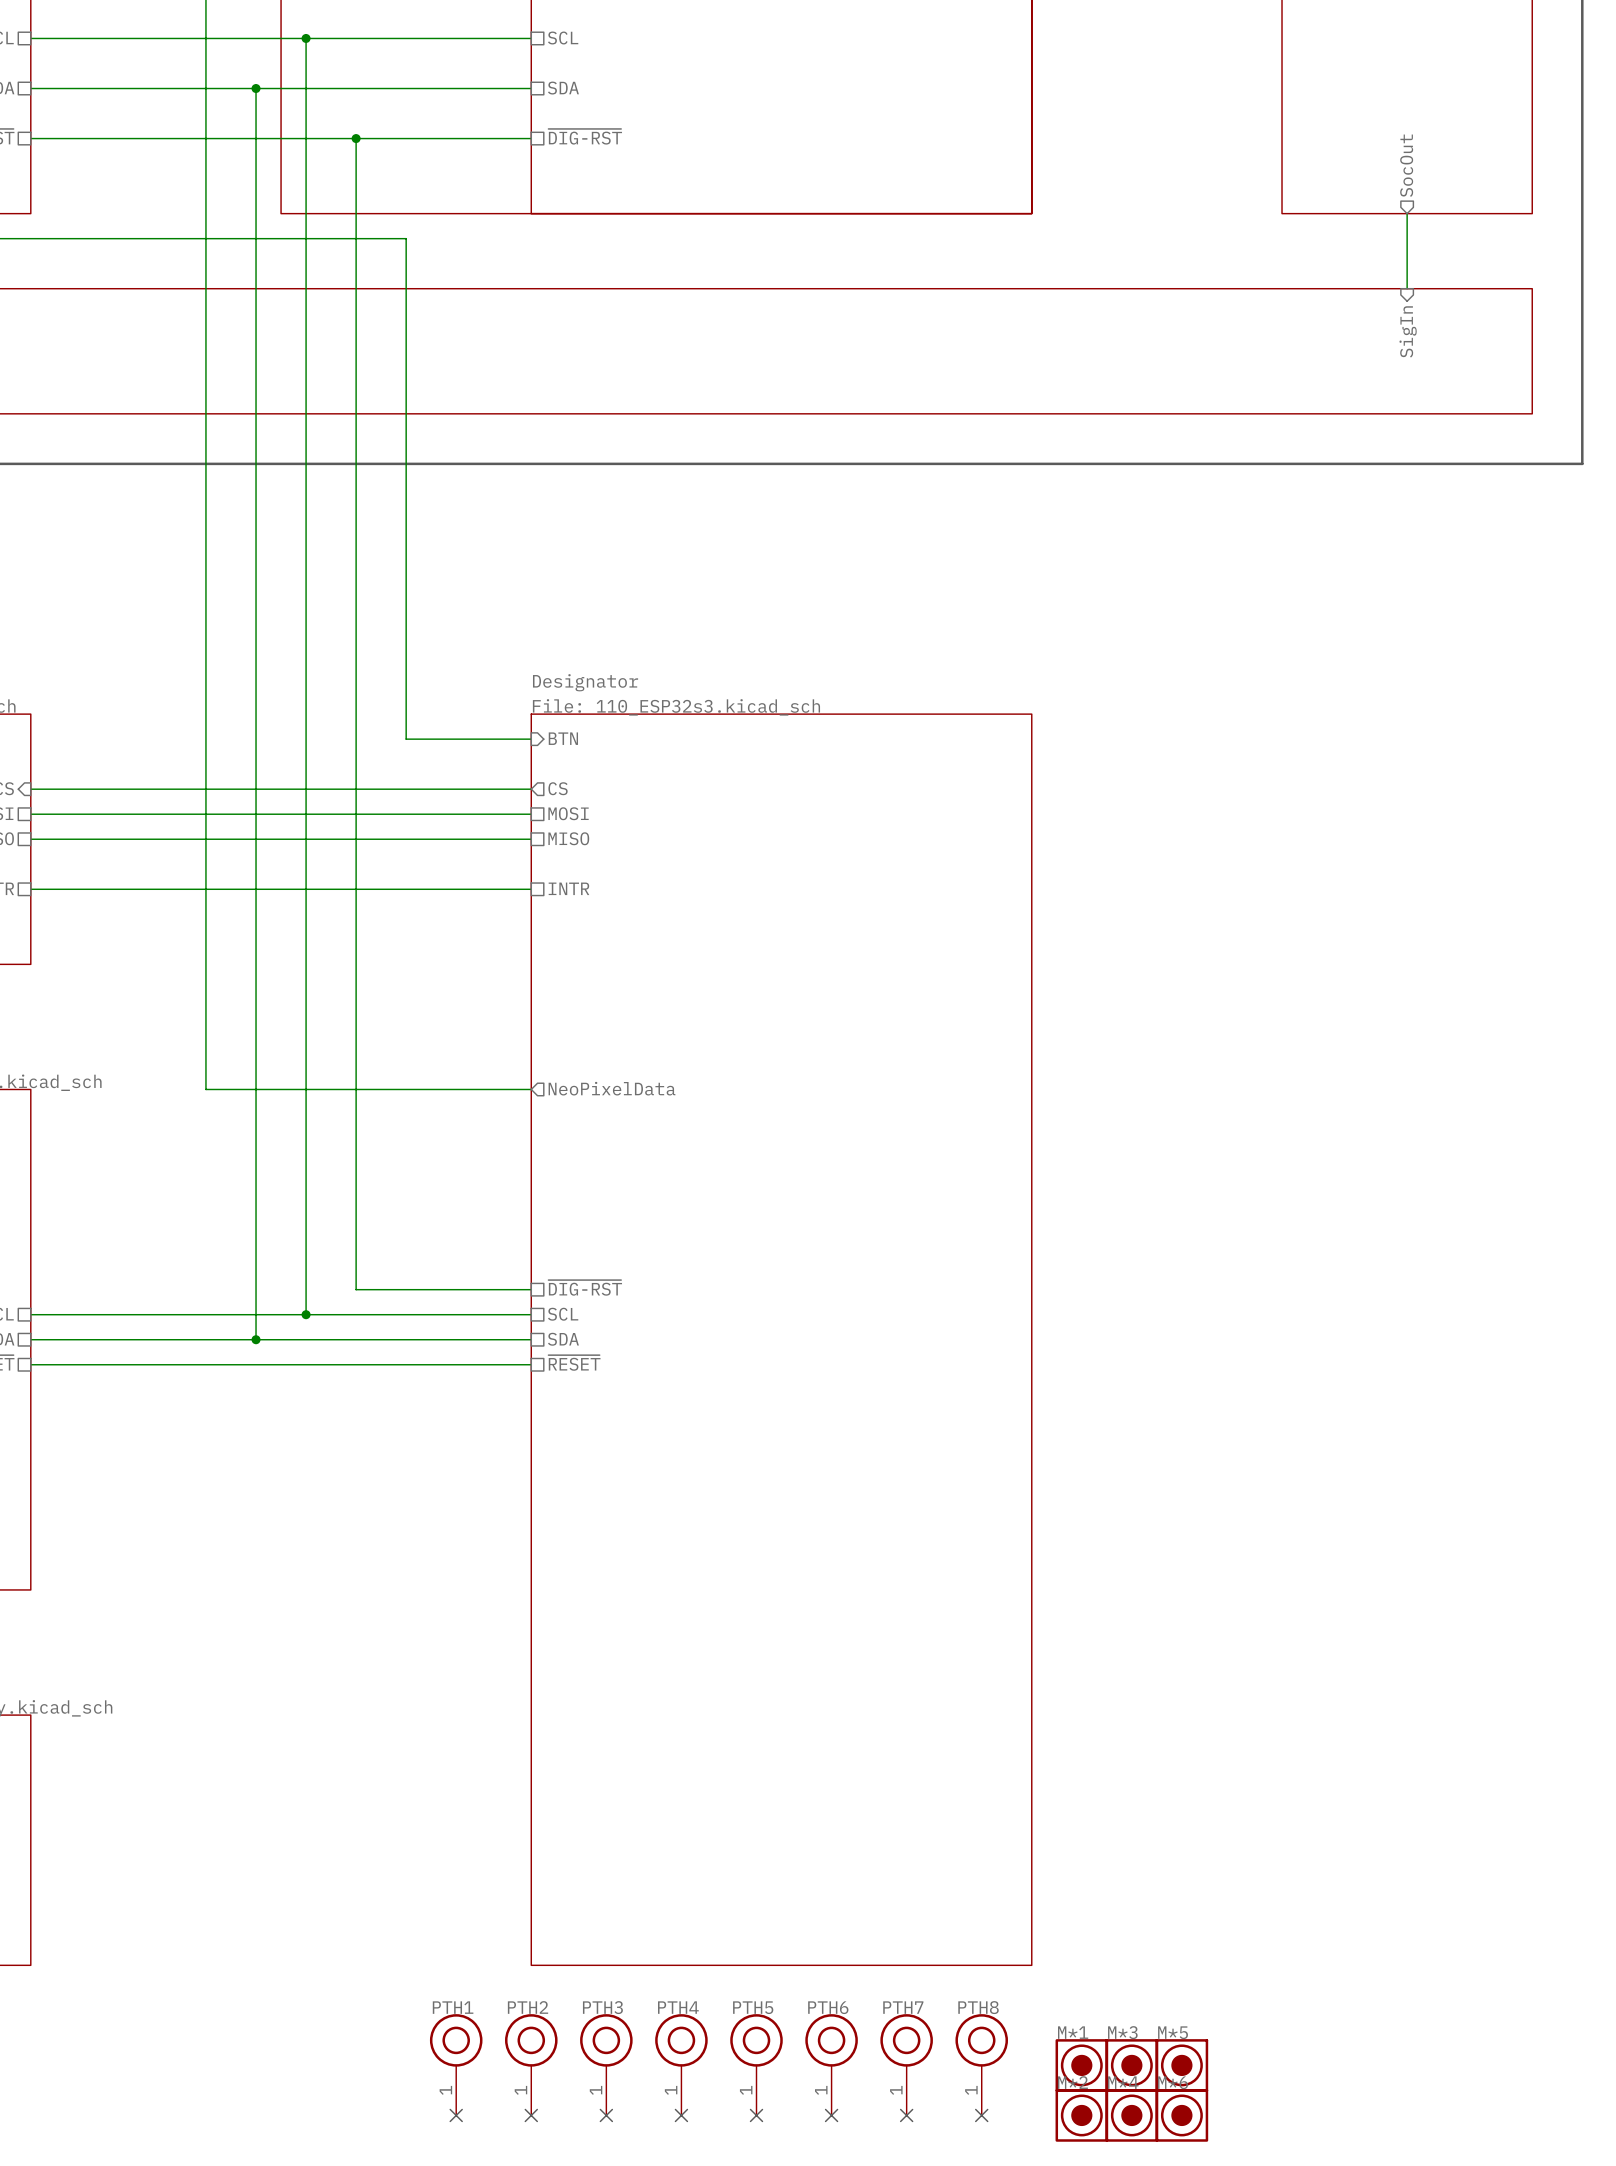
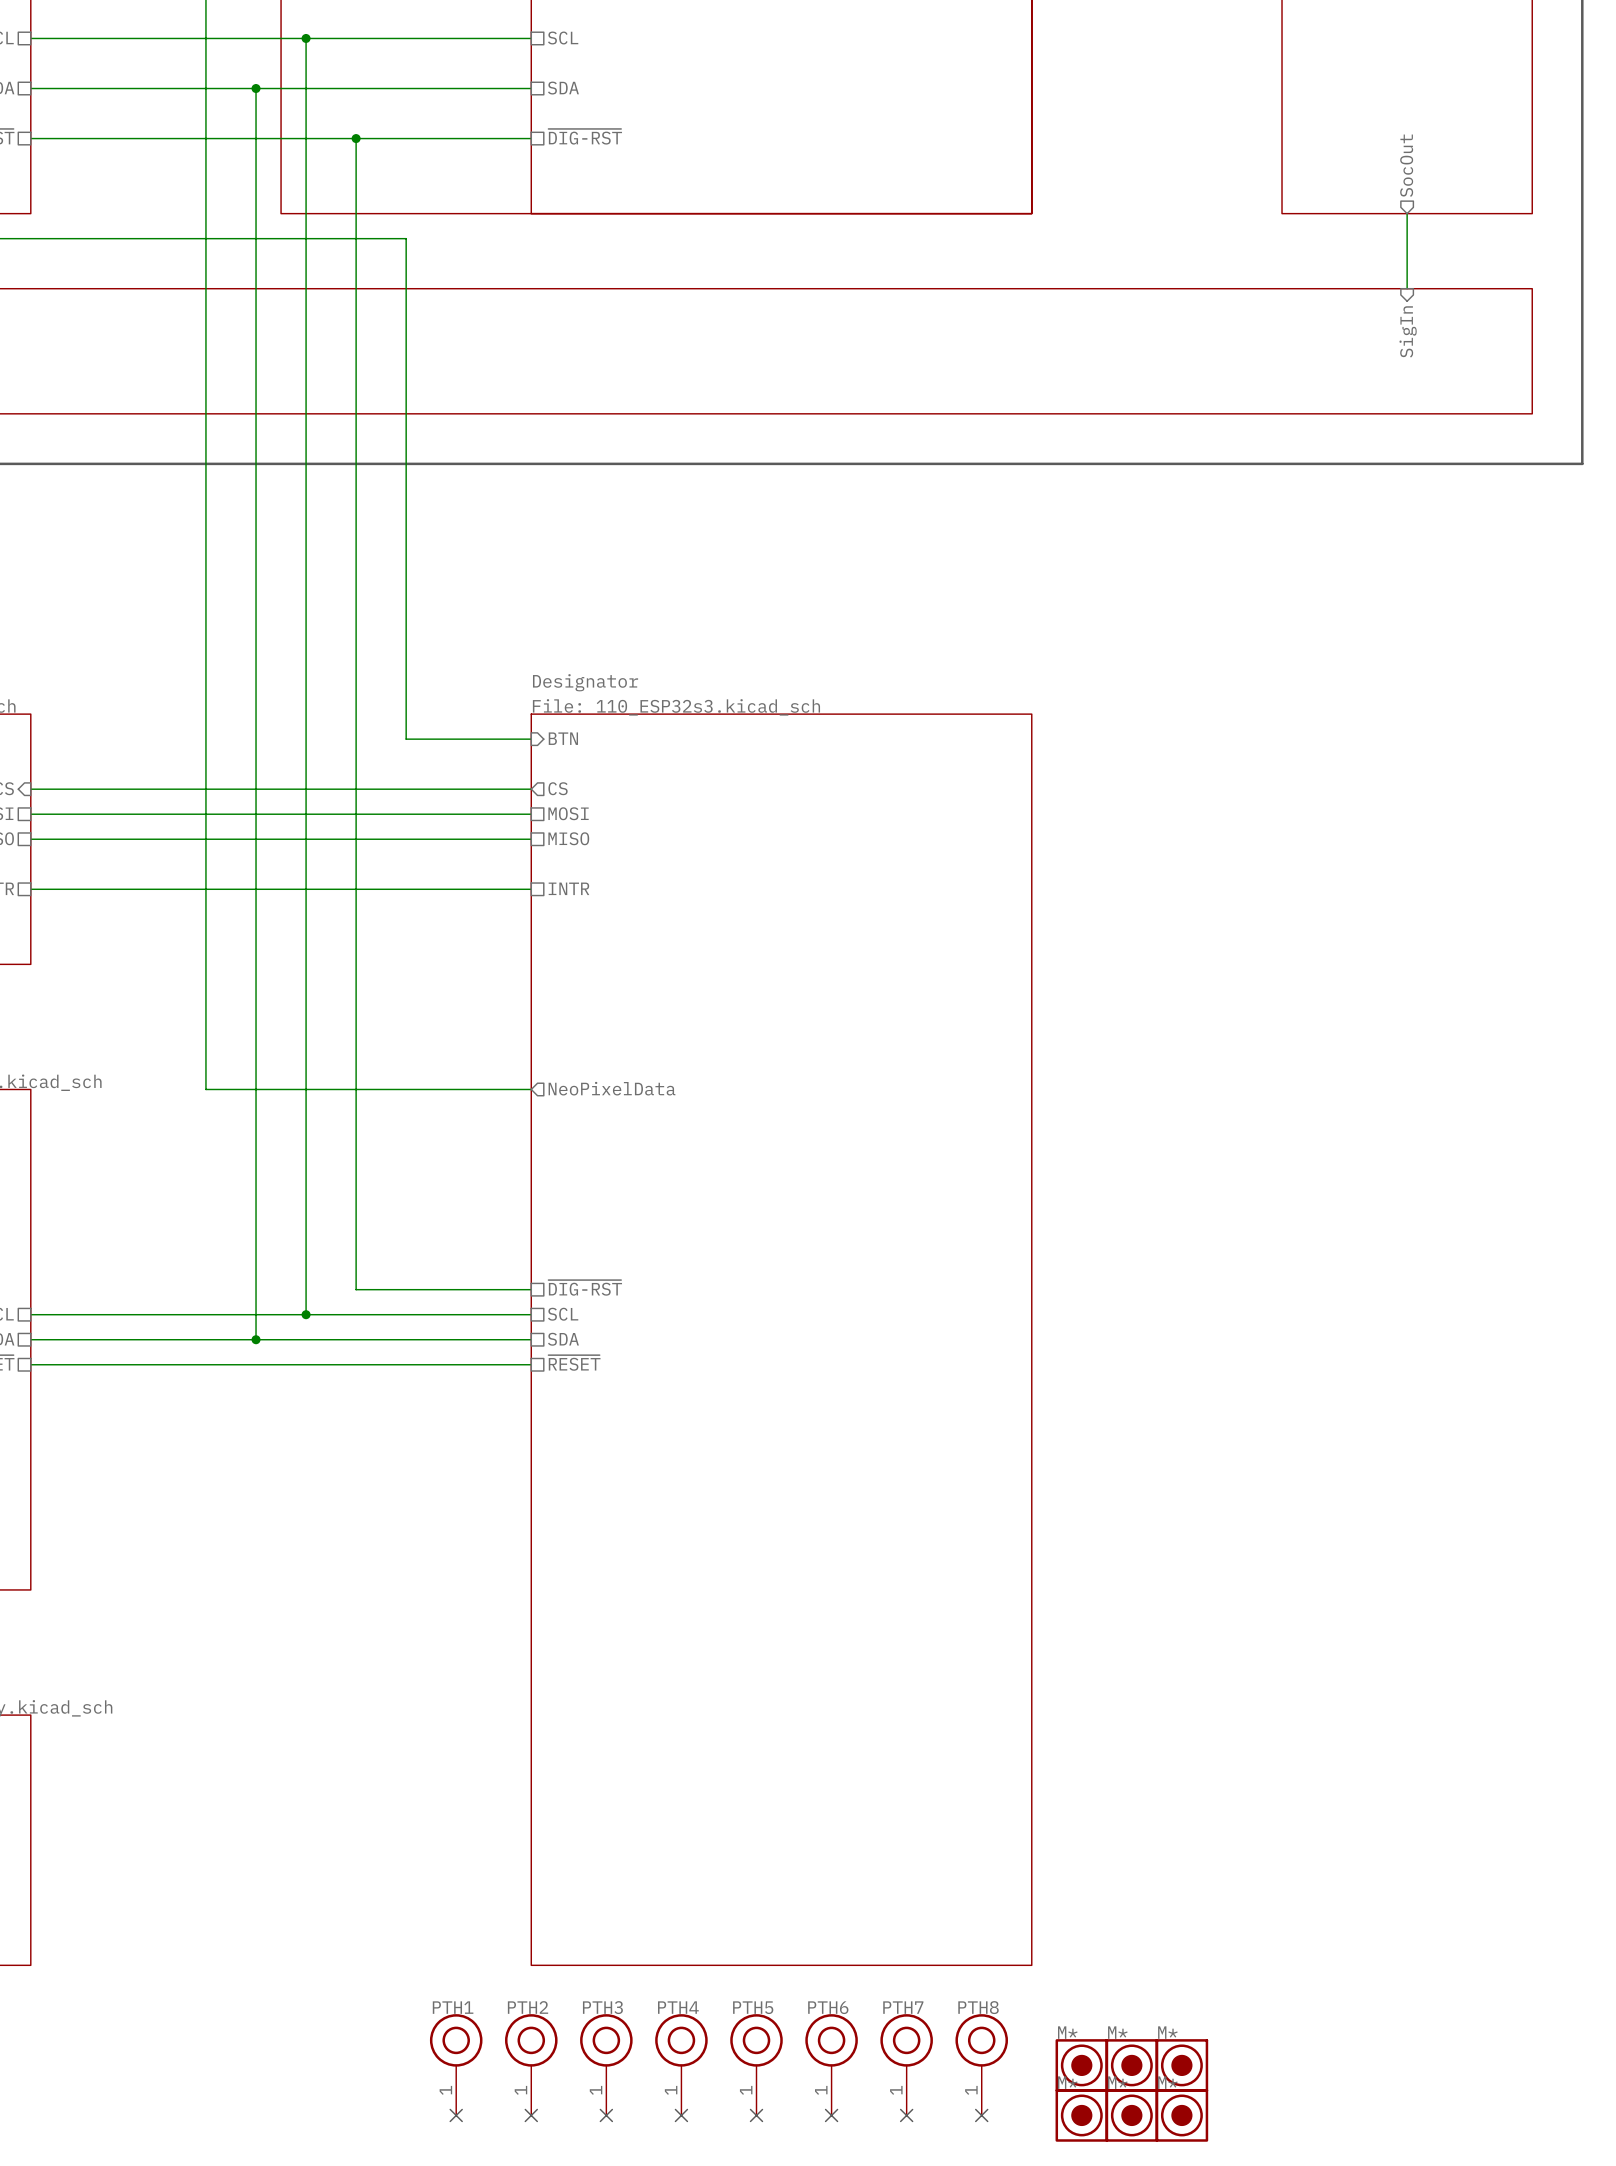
M*1 name: M*1 (1073, 2032) -> M* (1067, 2032)
M*3 name: M*3 (1122, 2032) -> M* (1117, 2032)
M*5 name: M*5 (1173, 2032) -> M* (1167, 2032)
M*2 name: M*2 (1072, 2082) -> M* (1067, 2082)
M*4 name: M*4 (1123, 2082) -> M* (1117, 2082)
M*6 name: M*6 (1173, 2082) -> M* (1167, 2082)

